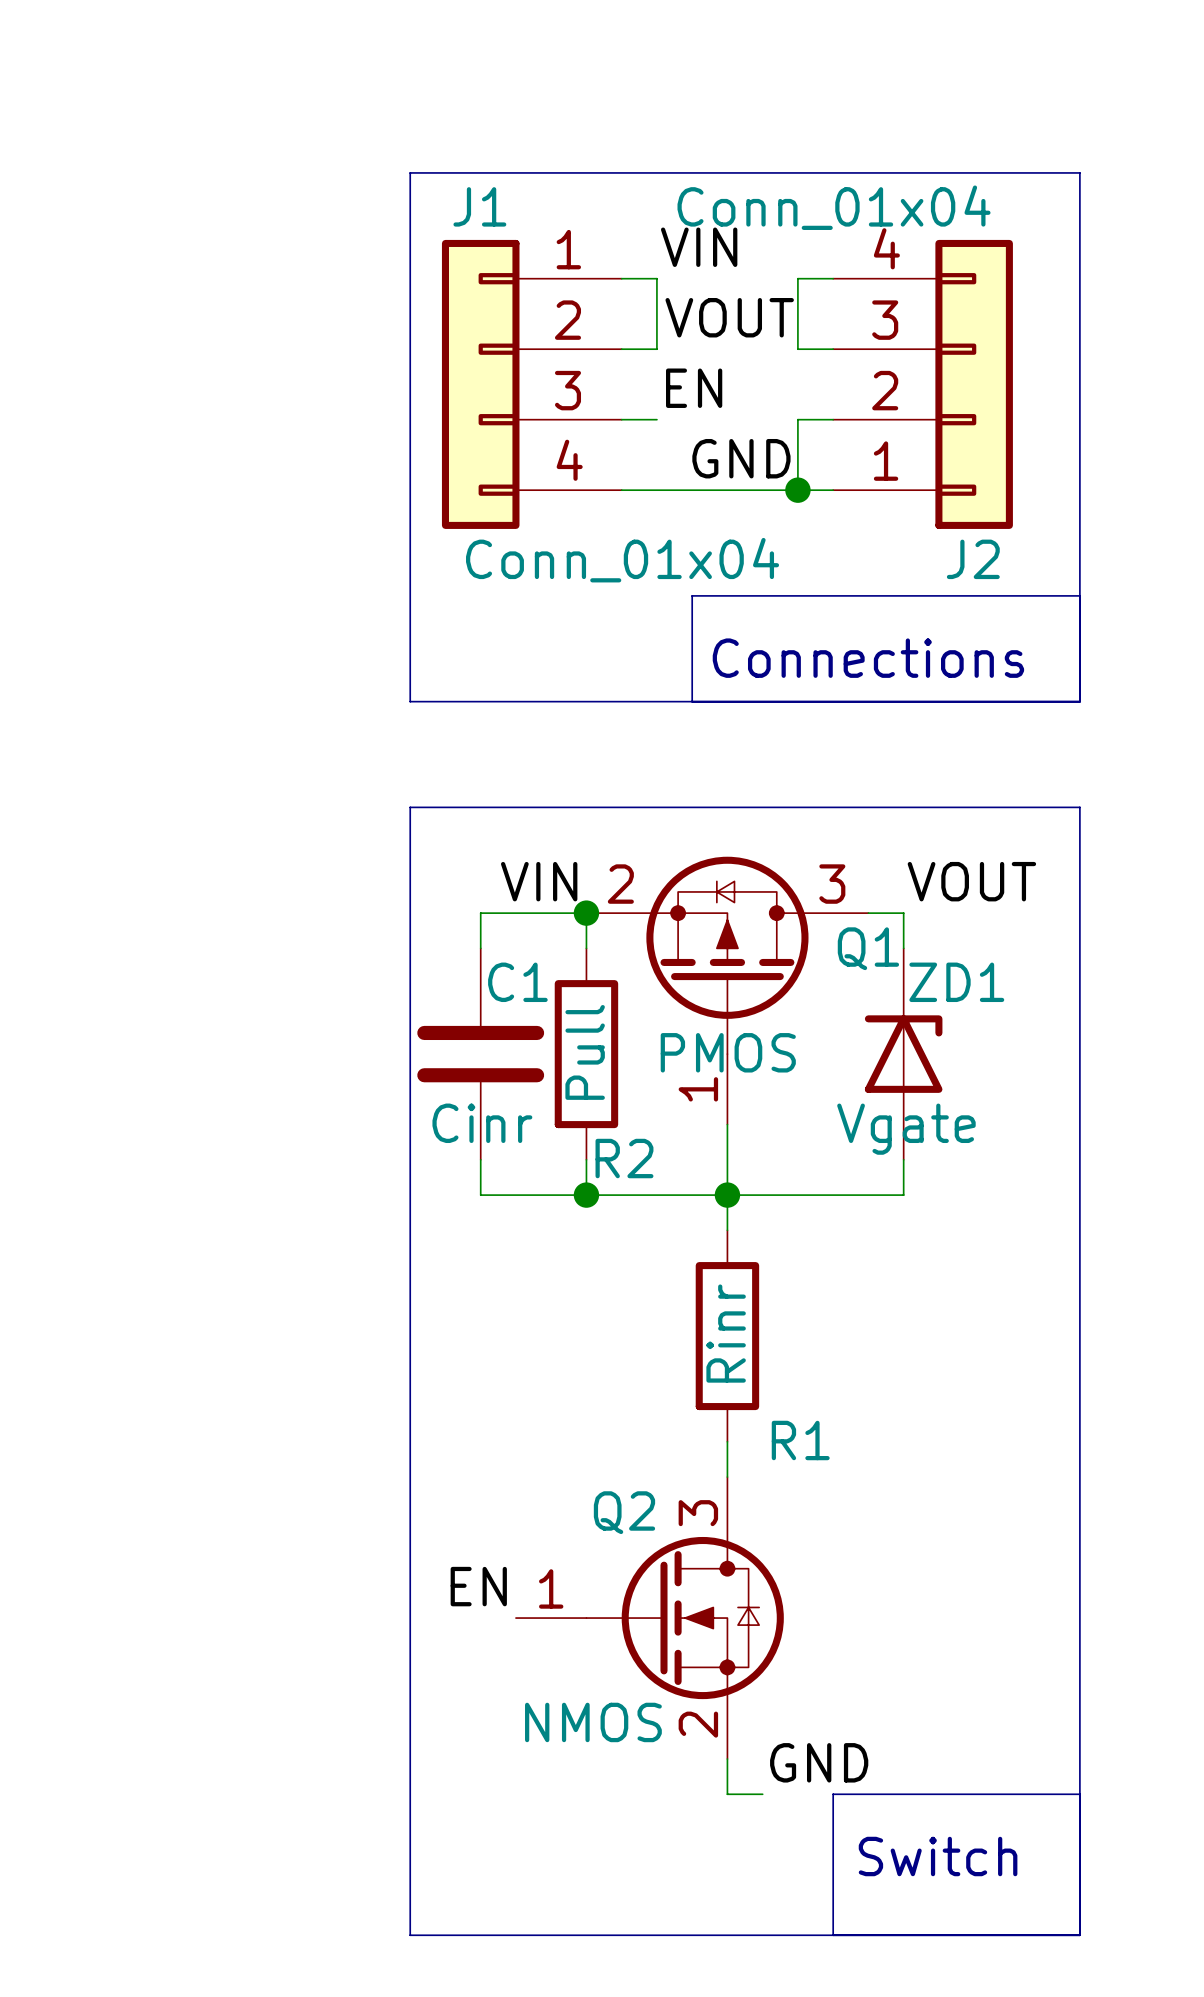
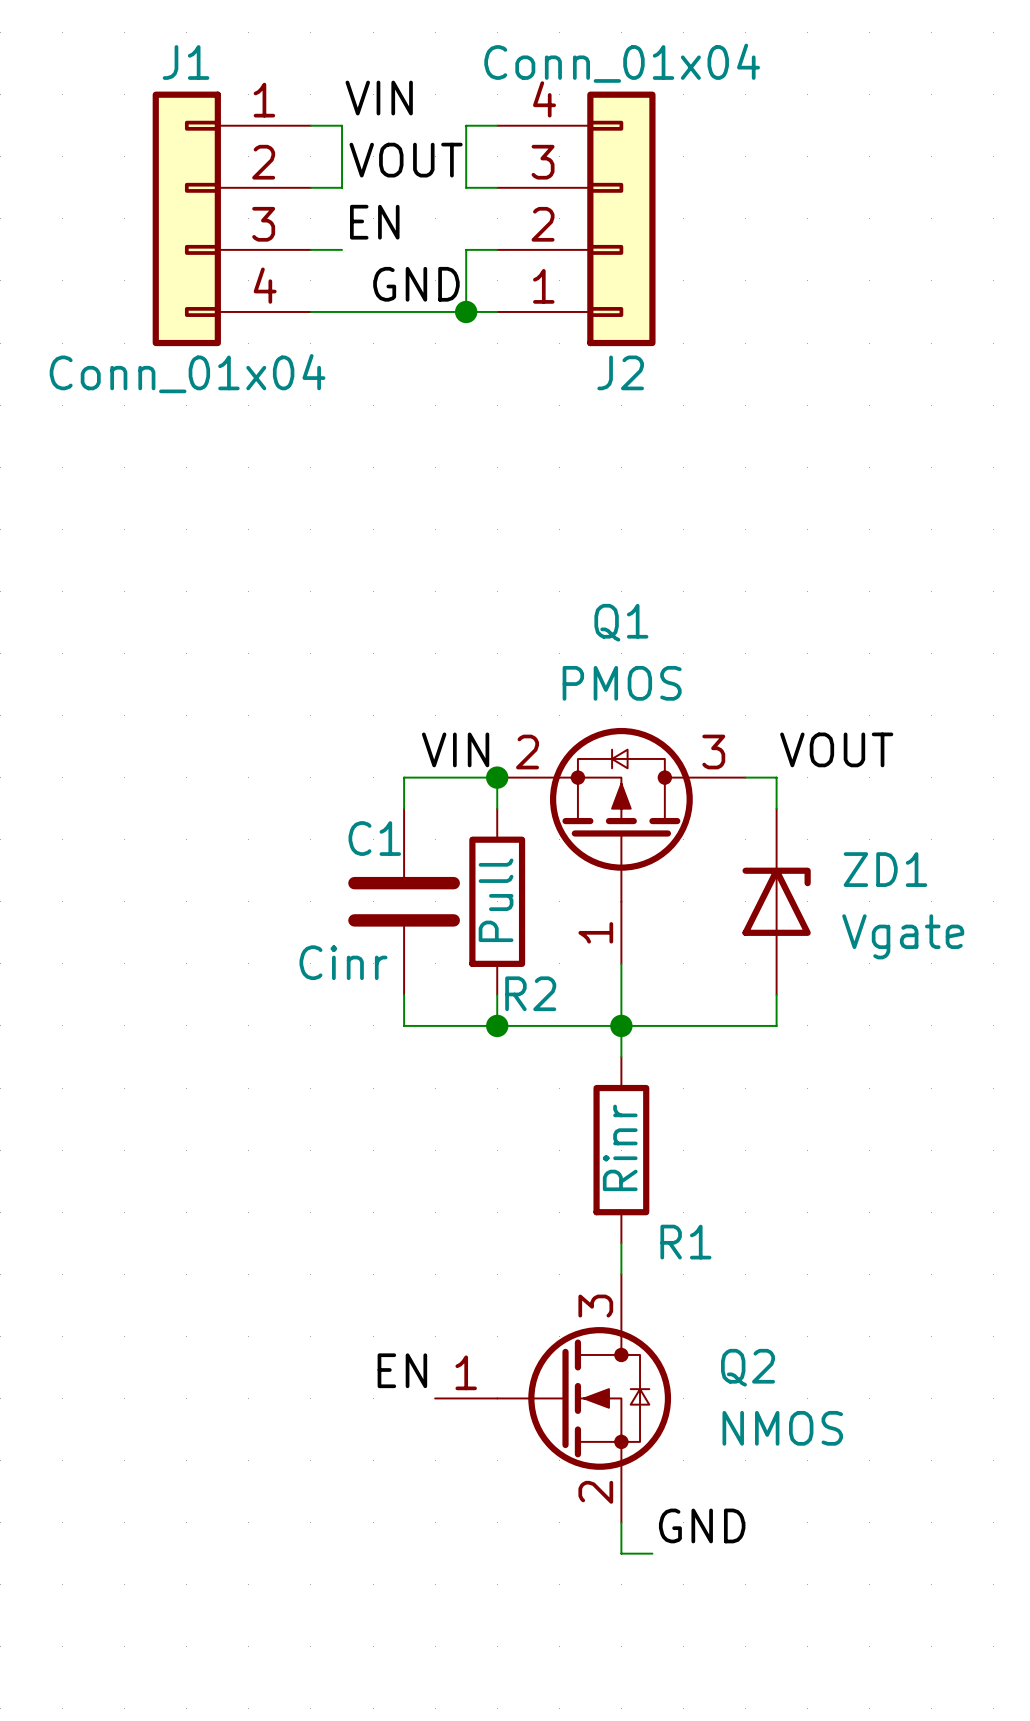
line: (410, 172) (410, 701) (1079, 701) (1079, 172) (410, 172) -> none
J2 value position: Conn_01x04 (834, 207) -> Conn_01x04 (622, 63)
label position: VIN (699, 247) -> VIN (379, 98)
wire: (621, 278) (656, 278) (656, 349) (621, 349) -> (310, 125) (342, 125) (342, 187) (310, 187)
wire: (833, 278) (797, 278) (797, 349) (833, 349) -> (497, 125) (466, 125) (466, 187) (497, 187)
label position: VOUT (729, 317) -> VOUT (406, 160)
J1 position: (531, 384) -> (231, 218)
junction: none -> (466, 311)
J2 position: (923, 384) -> (576, 218)
label position: EN (694, 388) -> EN (374, 222)
wire: (621, 419) (656, 419) -> (310, 249) (342, 249)
wire: (833, 419) (797, 419) (797, 490) -> (497, 249) (466, 249) (466, 311)
label position: GND (741, 458) -> GND (416, 284)
wire: (621, 490) (833, 490) -> (310, 311) (497, 311)
junction: (797, 490) -> none
J1 value position: Conn_01x04 (622, 560) -> Conn_01x04 (187, 373)
line: (1079, 595) (692, 595) (692, 701) -> none
text: Connections (868, 658) -> none
line: (410, 807) (1079, 807) (1079, 1935) (410, 1935) (410, 807) -> none
Q1 name position: Q1 (868, 948) -> Q1 (621, 622)
C1 name position: C1 (517, 982) -> C1 (374, 838)
ZD1 name position: ZD1 (956, 982) -> ZD1 (885, 869)
Q1 value position: PMOS (728, 1052) -> PMOS (622, 683)
C1 value position: Cinr (482, 1123) -> Cinr (343, 962)
ZD1 value position: Vgate (906, 1129) -> Vgate (903, 936)
Q2 name position: Q2 (624, 1512) -> Q2 (748, 1367)
Q2 value position: NMOS (593, 1722) -> NMOS (782, 1428)
line: (1079, 1794) (833, 1794) (833, 1935) -> none
text: Switch (938, 1856) -> none

